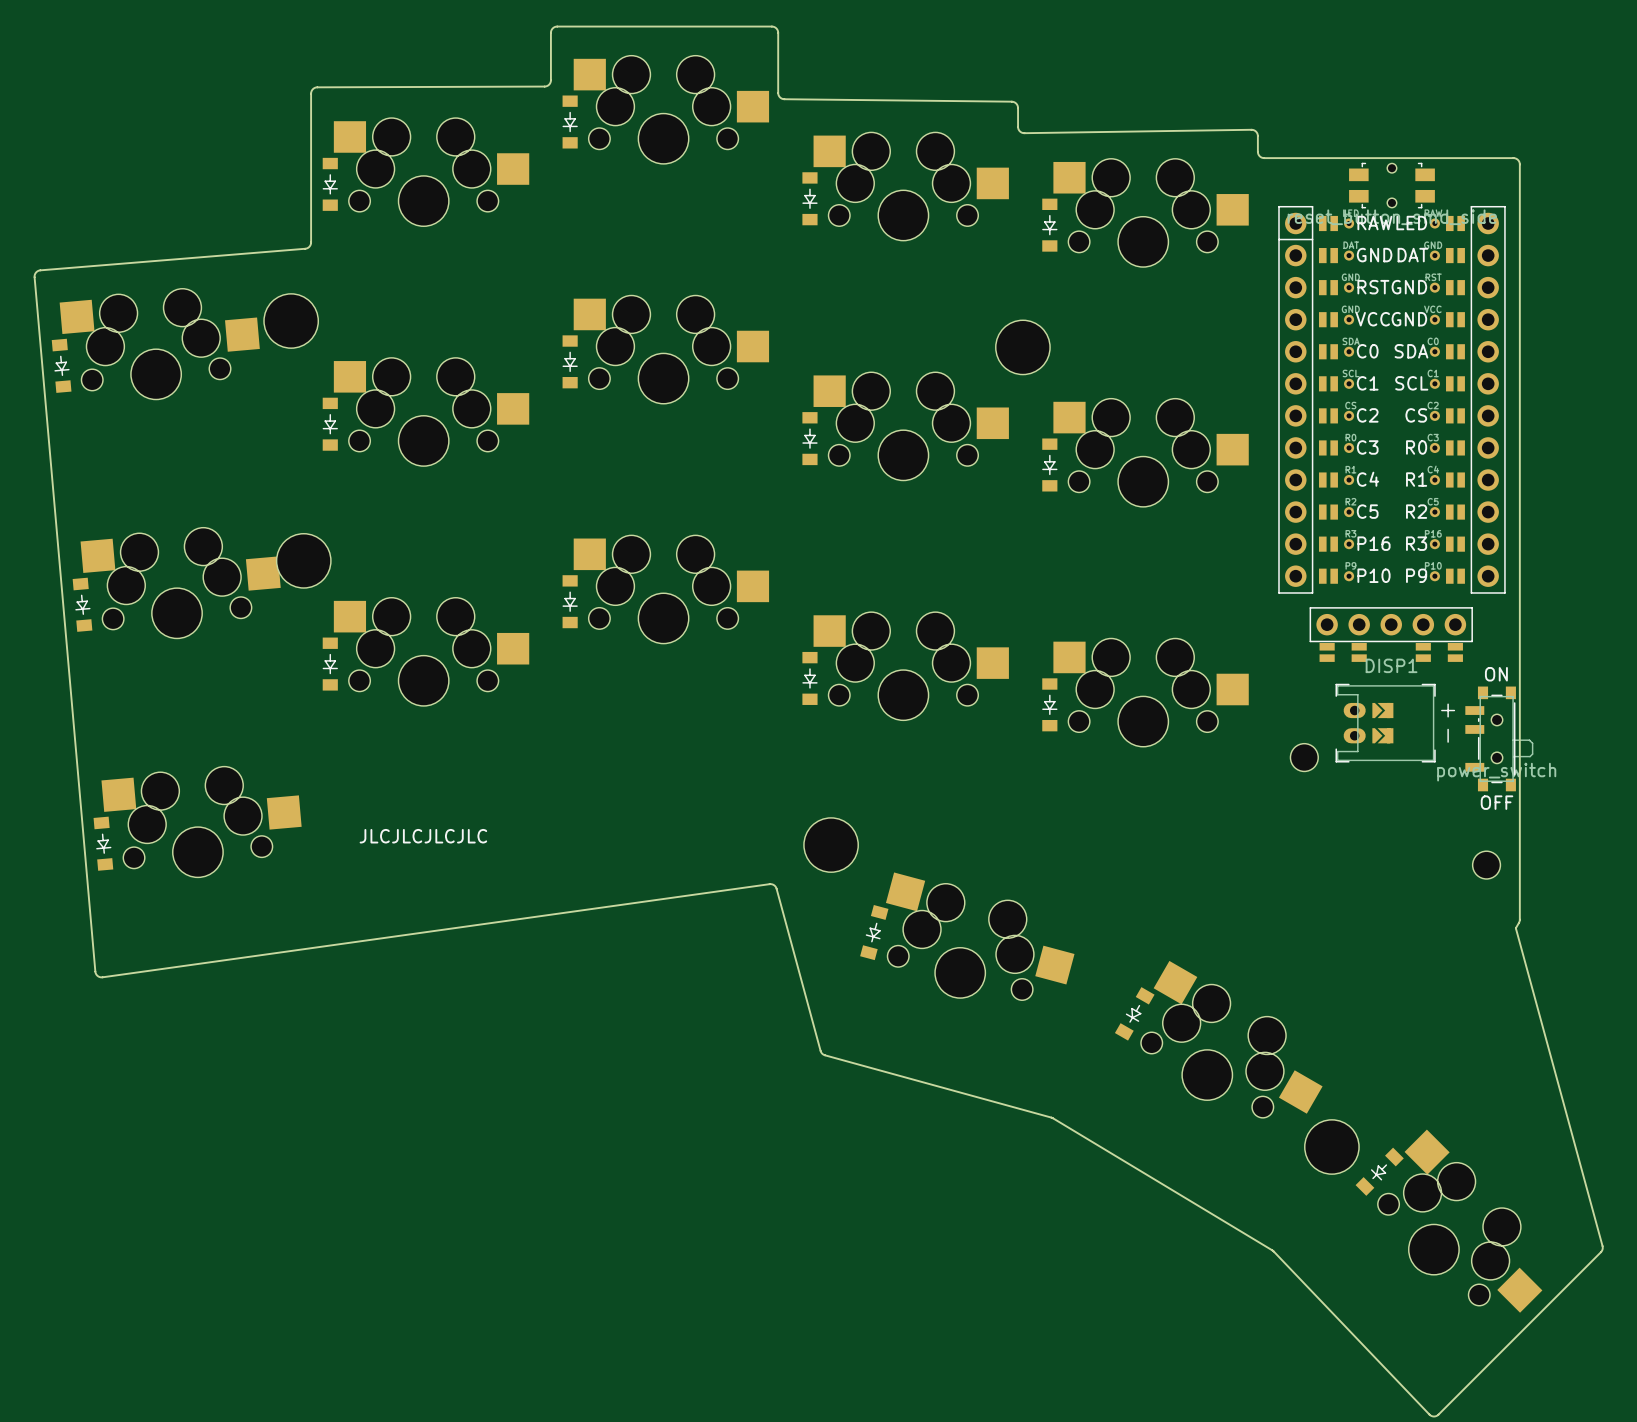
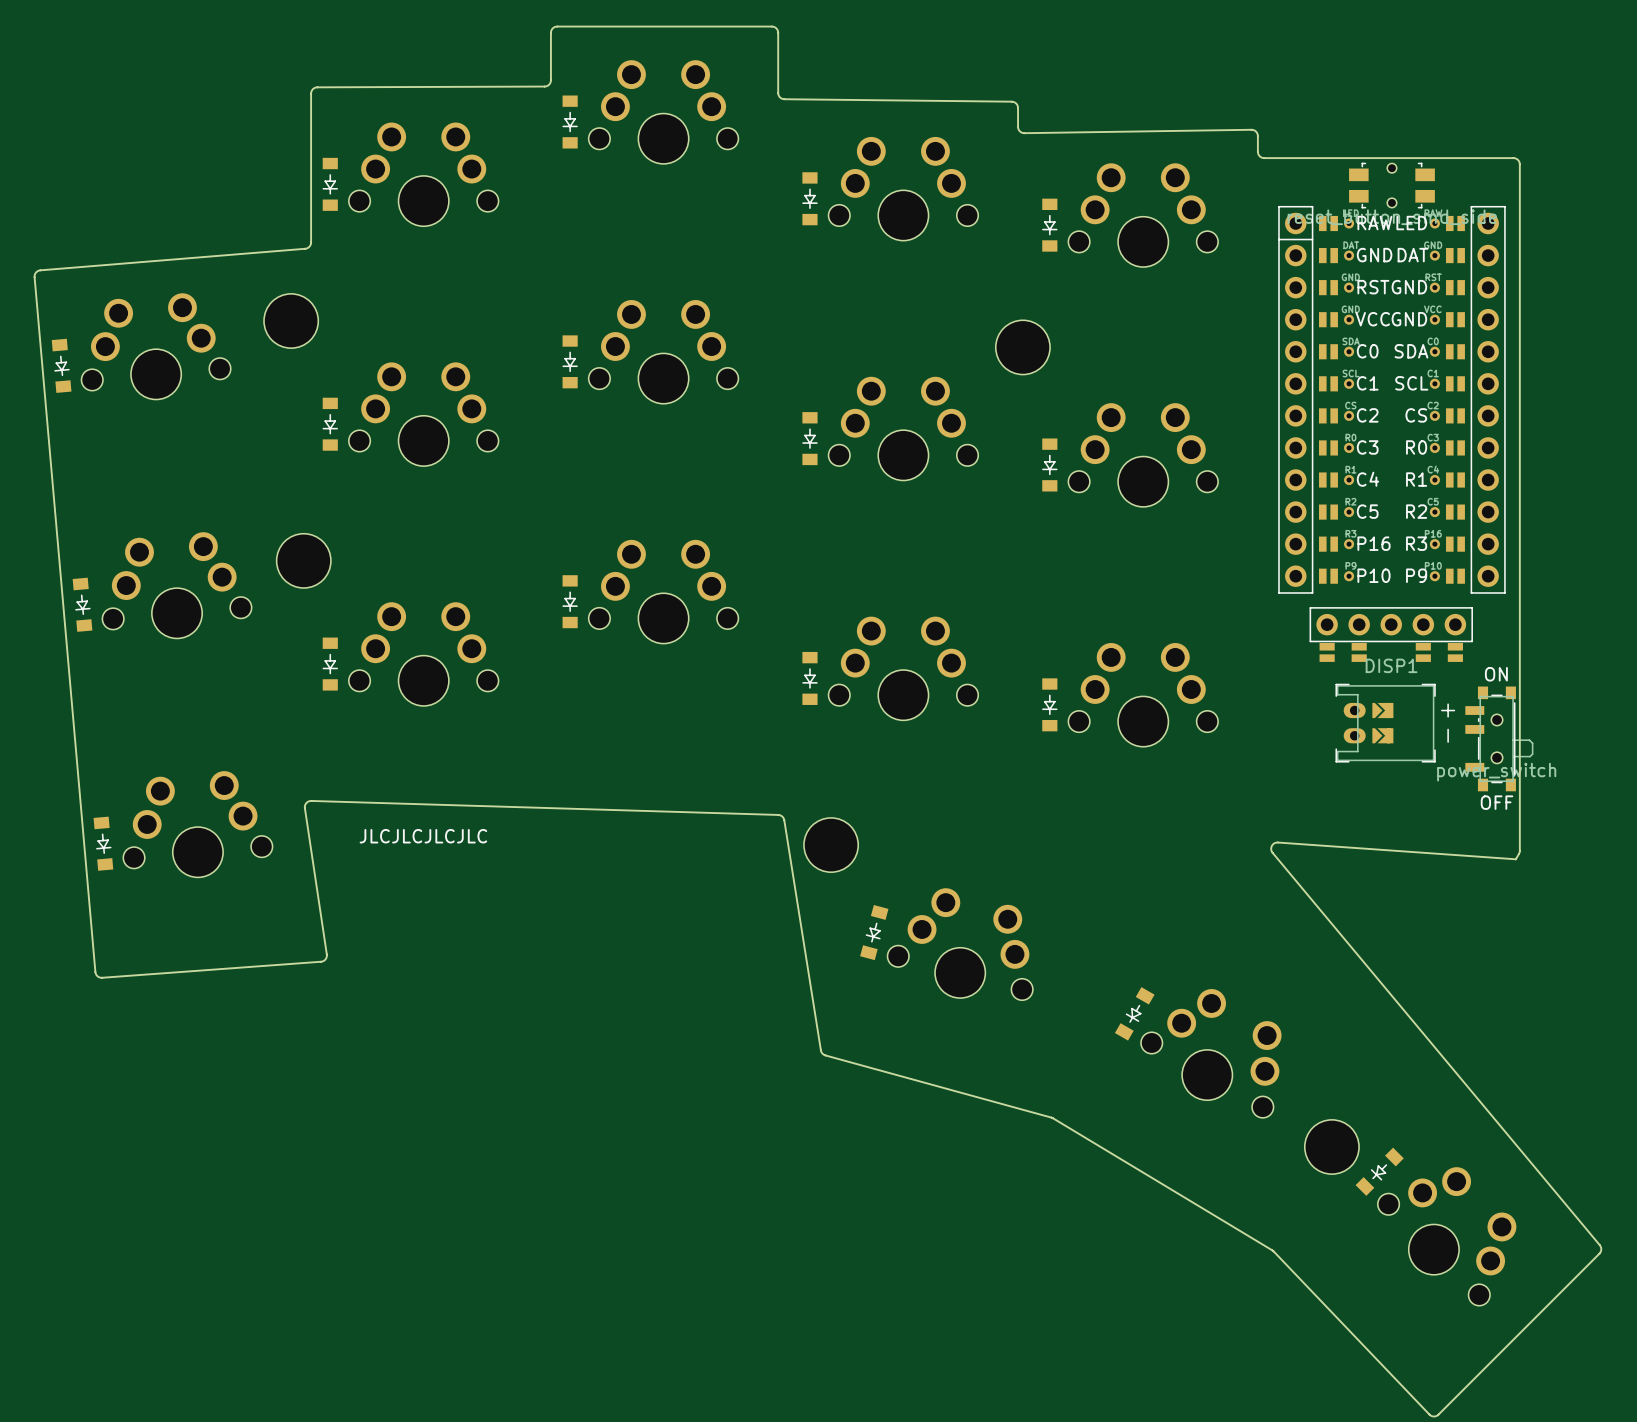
part footprint: [573, 55, 770, 164] -> [588, 60, 739, 164]
part footprint: [333, 118, 530, 227] -> [348, 122, 499, 227]
part footprint: [813, 132, 1009, 241] -> [828, 136, 979, 241]
part footprint: [1053, 158, 1249, 268] -> [1068, 163, 1219, 268]
part footprint: [59, 288, 260, 400] -> [81, 293, 231, 400]
part footprint: [573, 295, 770, 404] -> [588, 300, 739, 404]
part footprint: [333, 357, 530, 467] -> [348, 362, 499, 467]
part footprint: [813, 372, 1009, 481] -> [828, 376, 979, 481]
part footprint: [1053, 398, 1249, 507] -> [1068, 403, 1219, 507]
part footprint: [80, 527, 281, 639] -> [102, 532, 252, 639]
part footprint: [573, 535, 770, 644] -> [588, 539, 739, 644]
part footprint: [333, 597, 530, 706] -> [348, 602, 499, 706]
part footprint: [813, 612, 1009, 721] -> [828, 616, 979, 721]
part footprint: [1053, 638, 1249, 747] -> [1068, 643, 1219, 747]
part: (1304, 757) -> none
part footprint: [101, 766, 302, 878] -> [123, 771, 273, 878]
board edge: (1519, 850) (1519, 919) (1515, 928) (1602, 1246) (1599, 1253) -> (1519, 850) (1515, 859) (1277, 842) (1273, 844) (1271, 849) (1599, 1245) (1601, 1249) (1599, 1253)
part: (1486, 865) -> none
part: (980, 936) -> none
part: none -> (960, 944)
board edge: (95, 971) (97, 976) (102, 977) (771, 884) (776, 888) (820, 1050) (825, 1055) -> (95, 971) (97, 976) (102, 977) (324, 960) (326, 954) (304, 808) (305, 803) (309, 801) (778, 815) (784, 820) (820, 1050) (825, 1055)
part: (1231, 1039) -> none
part: none -> (1211, 1053)
part: (1460, 1221) -> none
part: none -> (1447, 1236)

